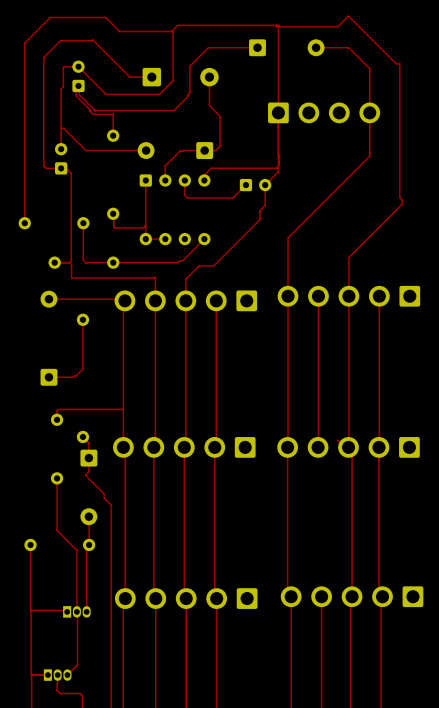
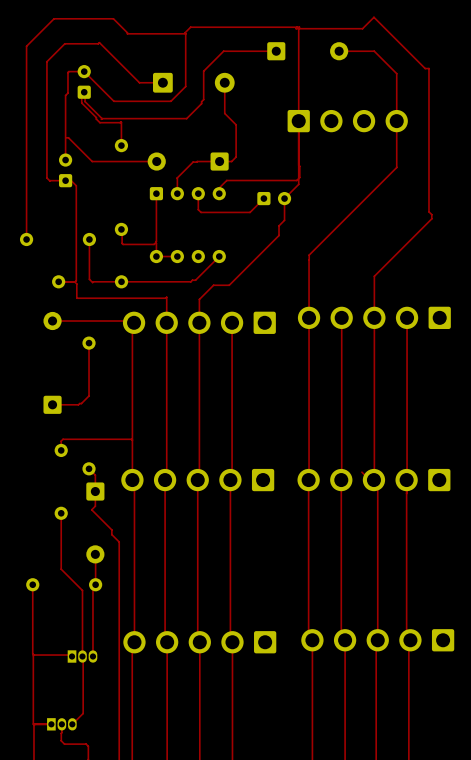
top track: none -> (341, 480) (341, 636) (345, 640)

